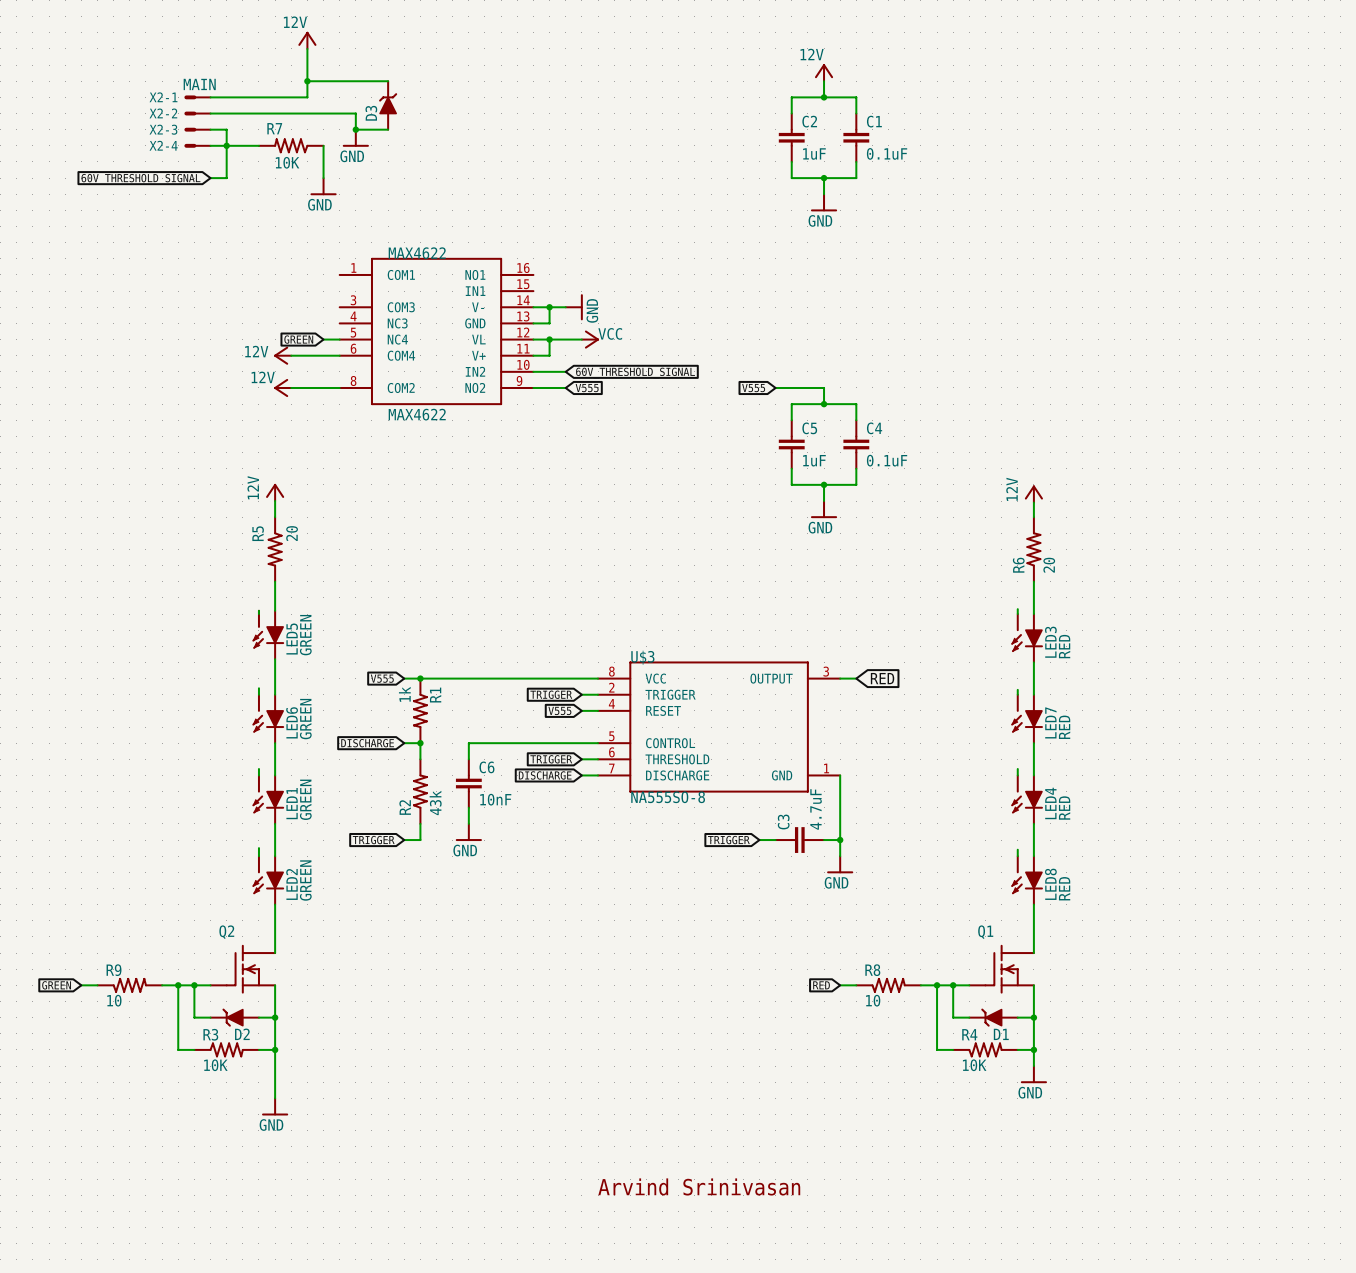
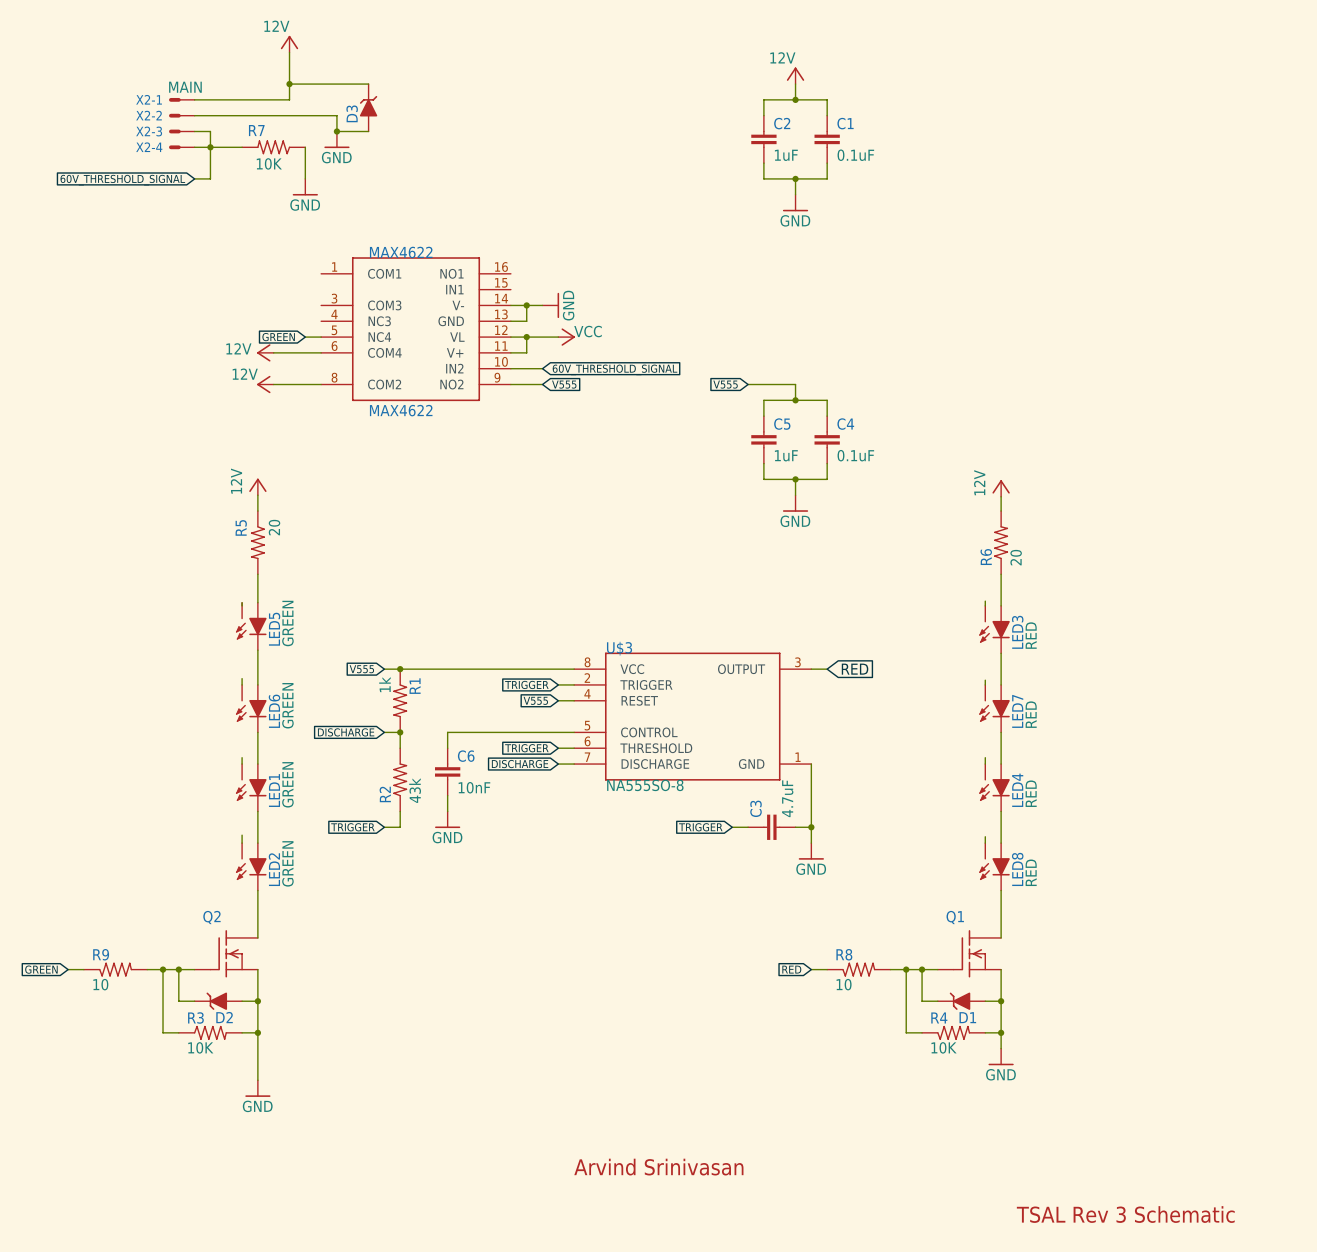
text: none -> TSAL Rev 3 Schematic (1125, 1214)

